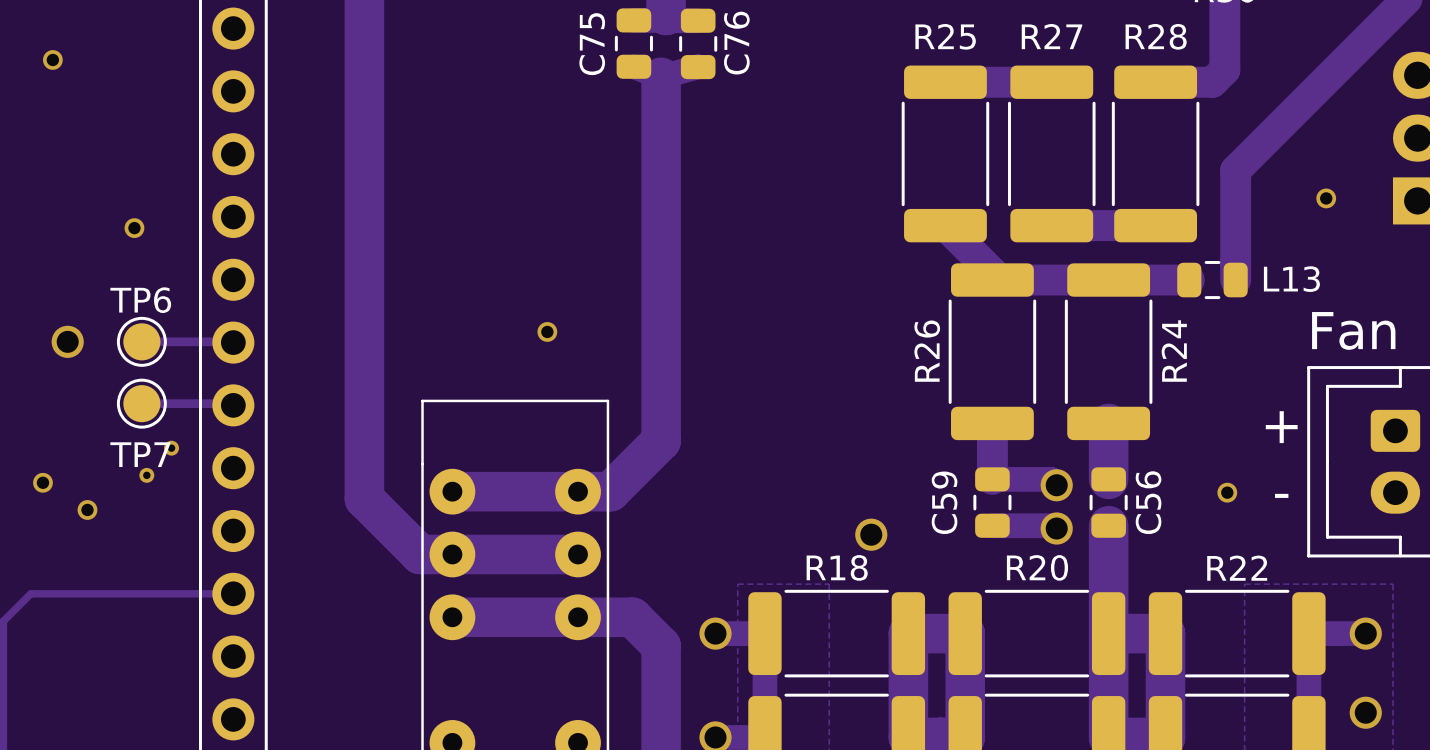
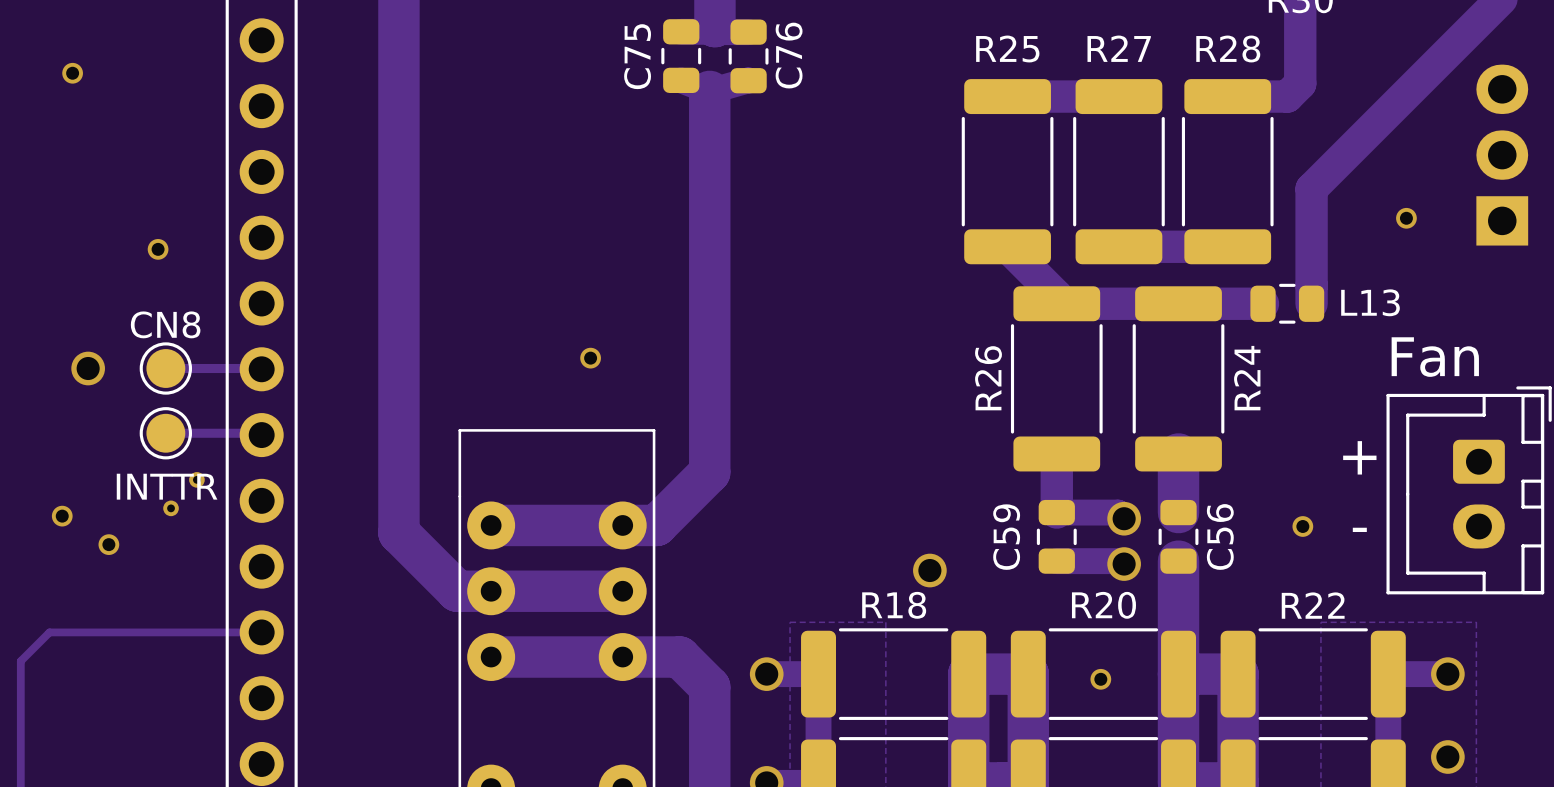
TP6 name: TP6 (140, 300) -> CN8 (165, 324)
TP7 name: TP7 (140, 454) -> INTTR (167, 486)
via: none -> (1100, 679)

